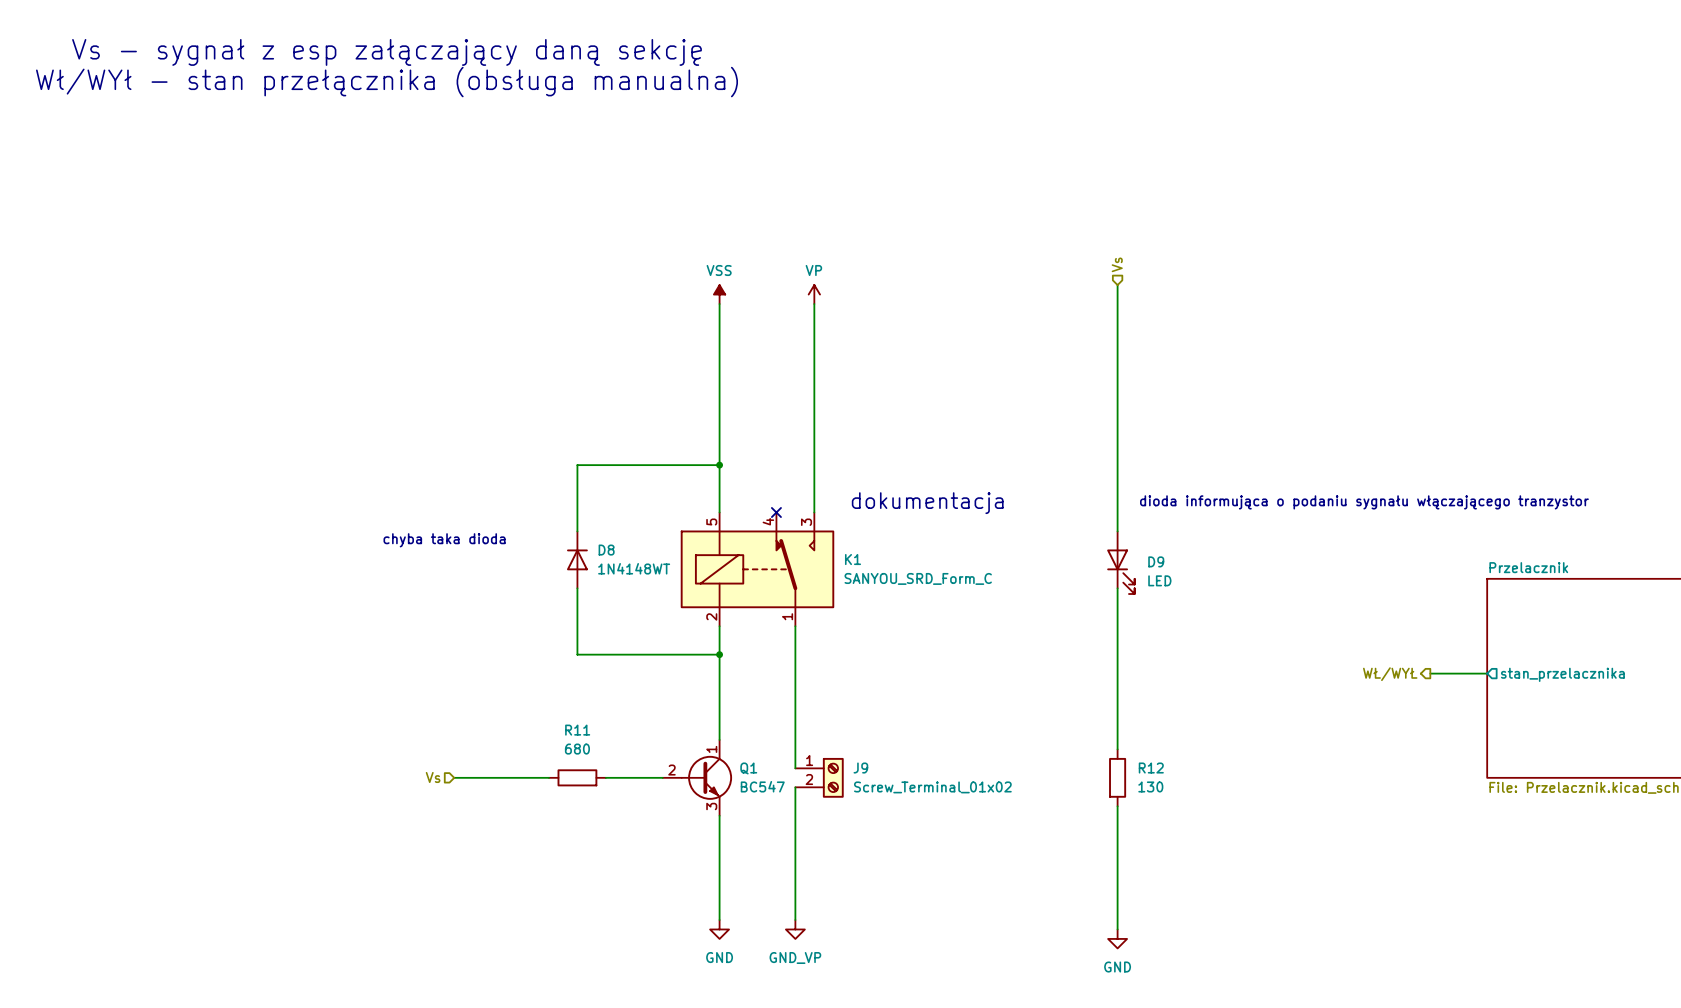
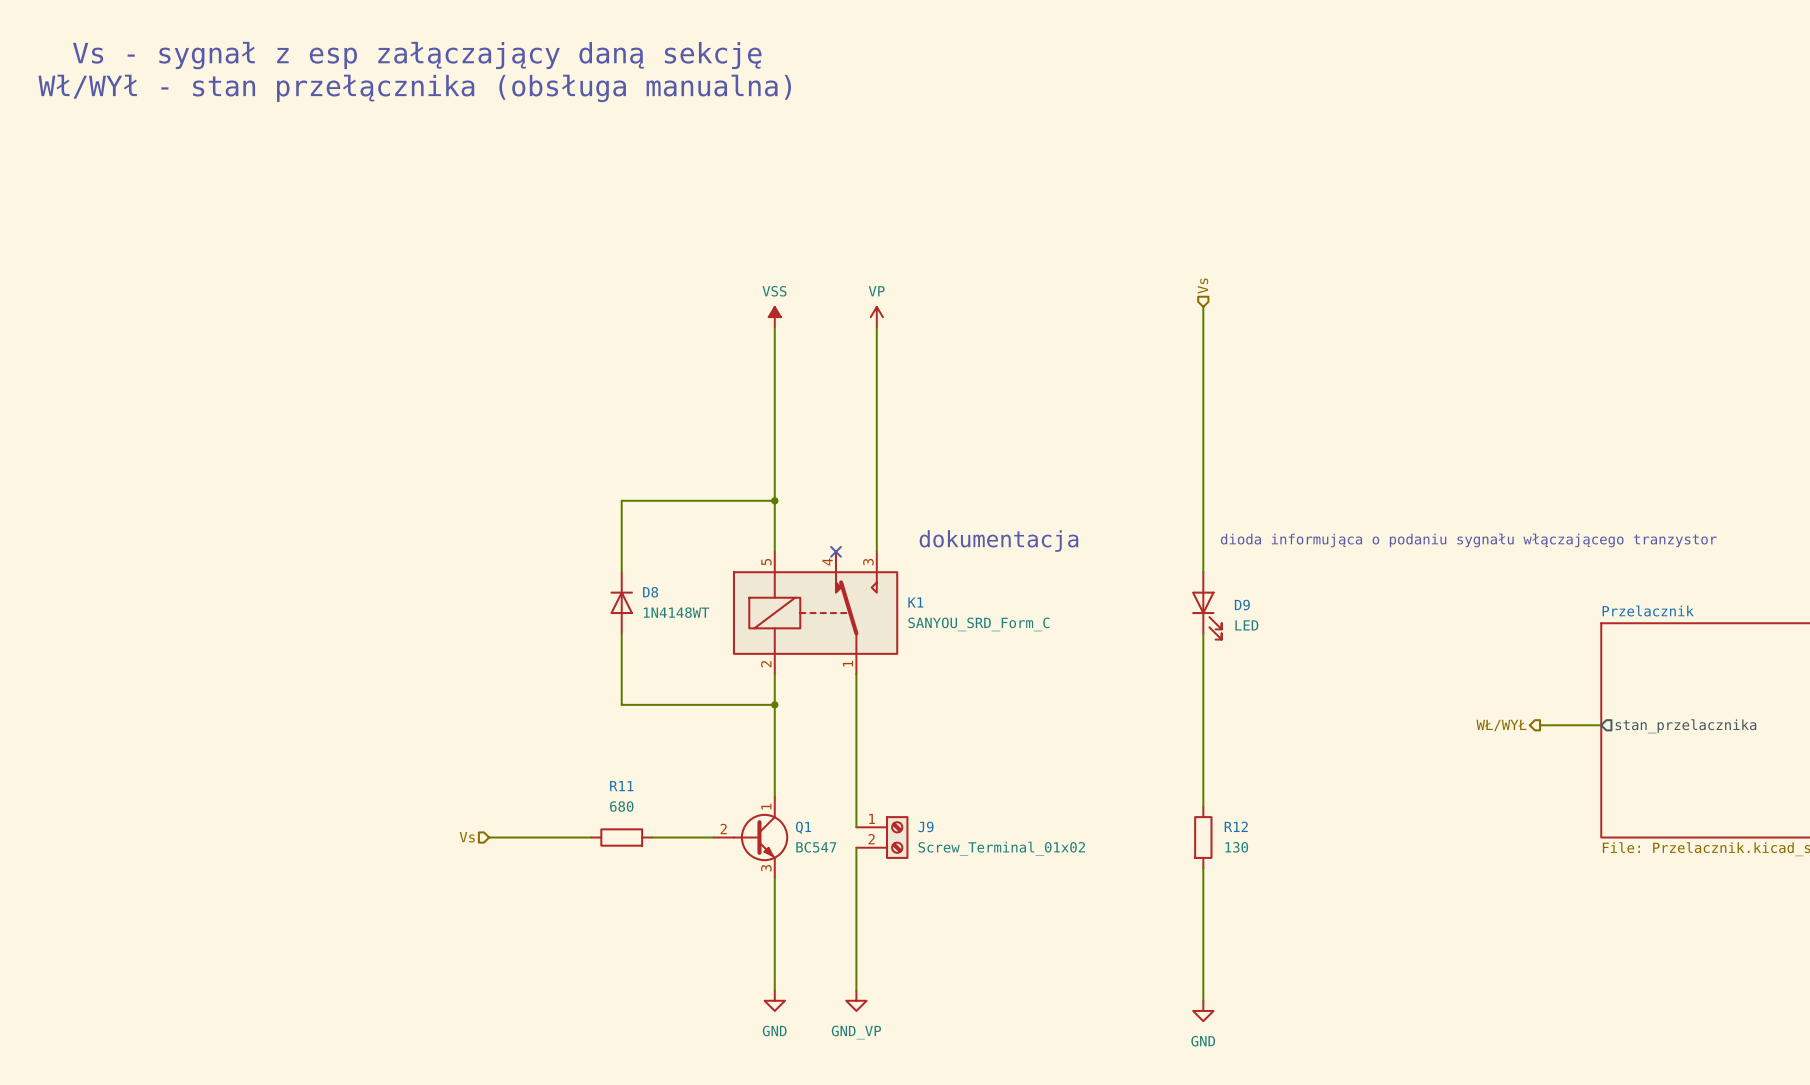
text: chyba taka dioda (444, 540) -> none

